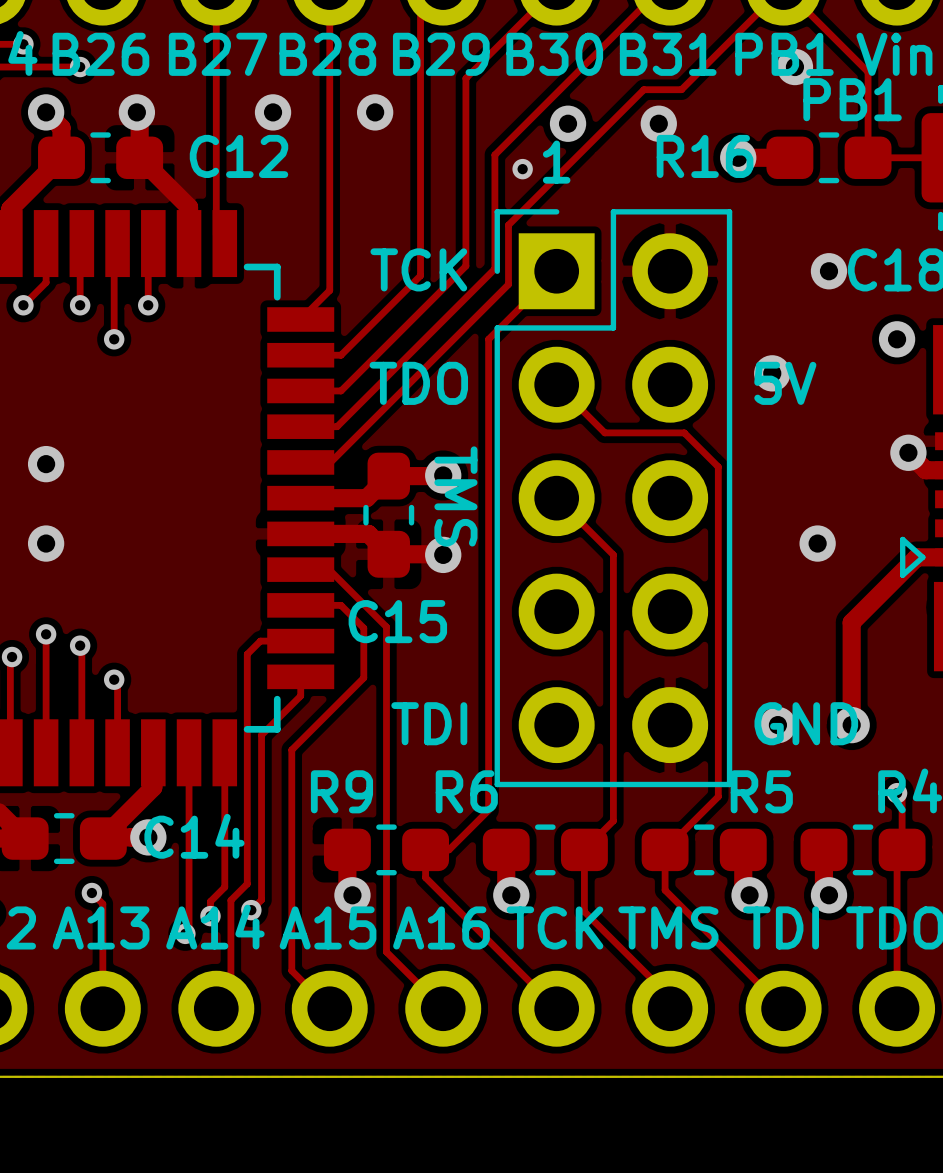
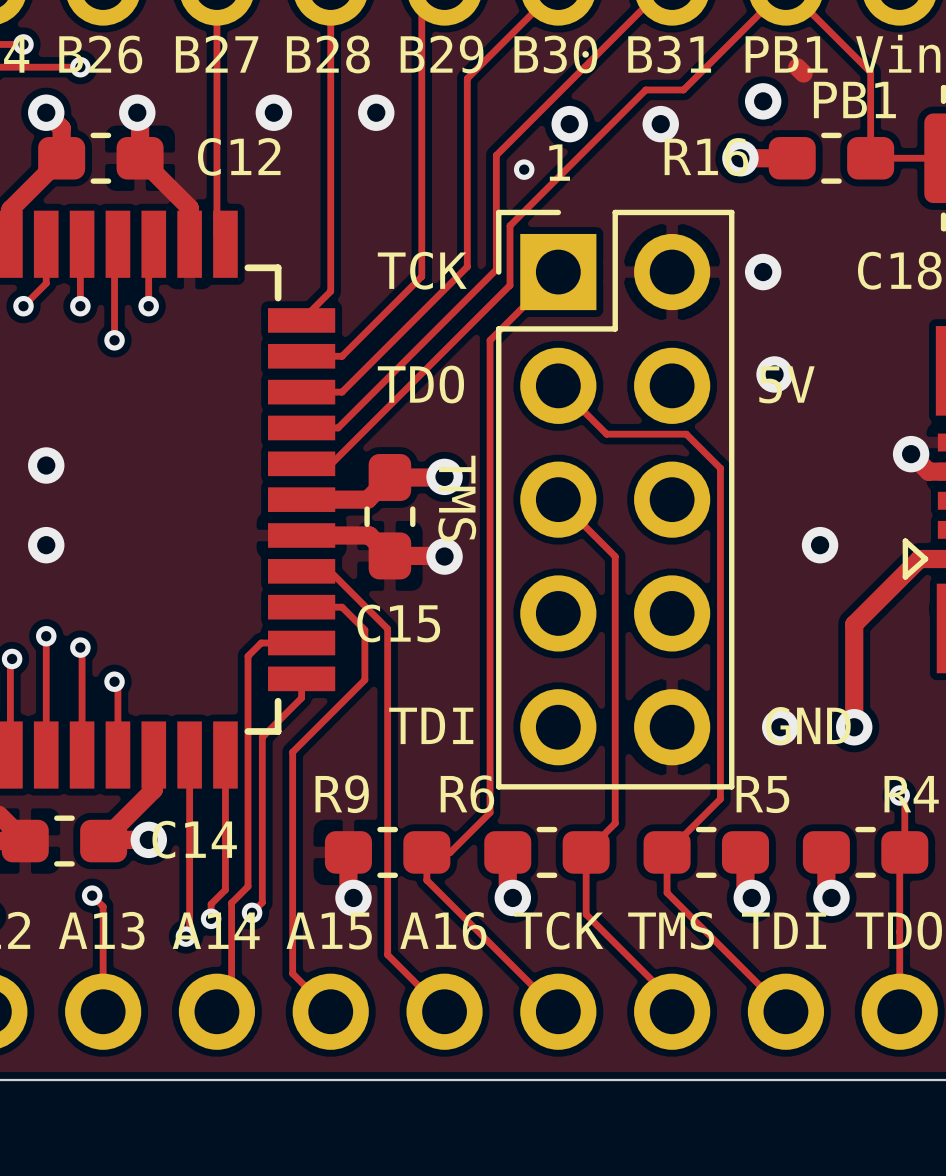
via position: (794, 67) -> (763, 101)
via position: (828, 271) -> (763, 272)
via: (897, 339) -> none

